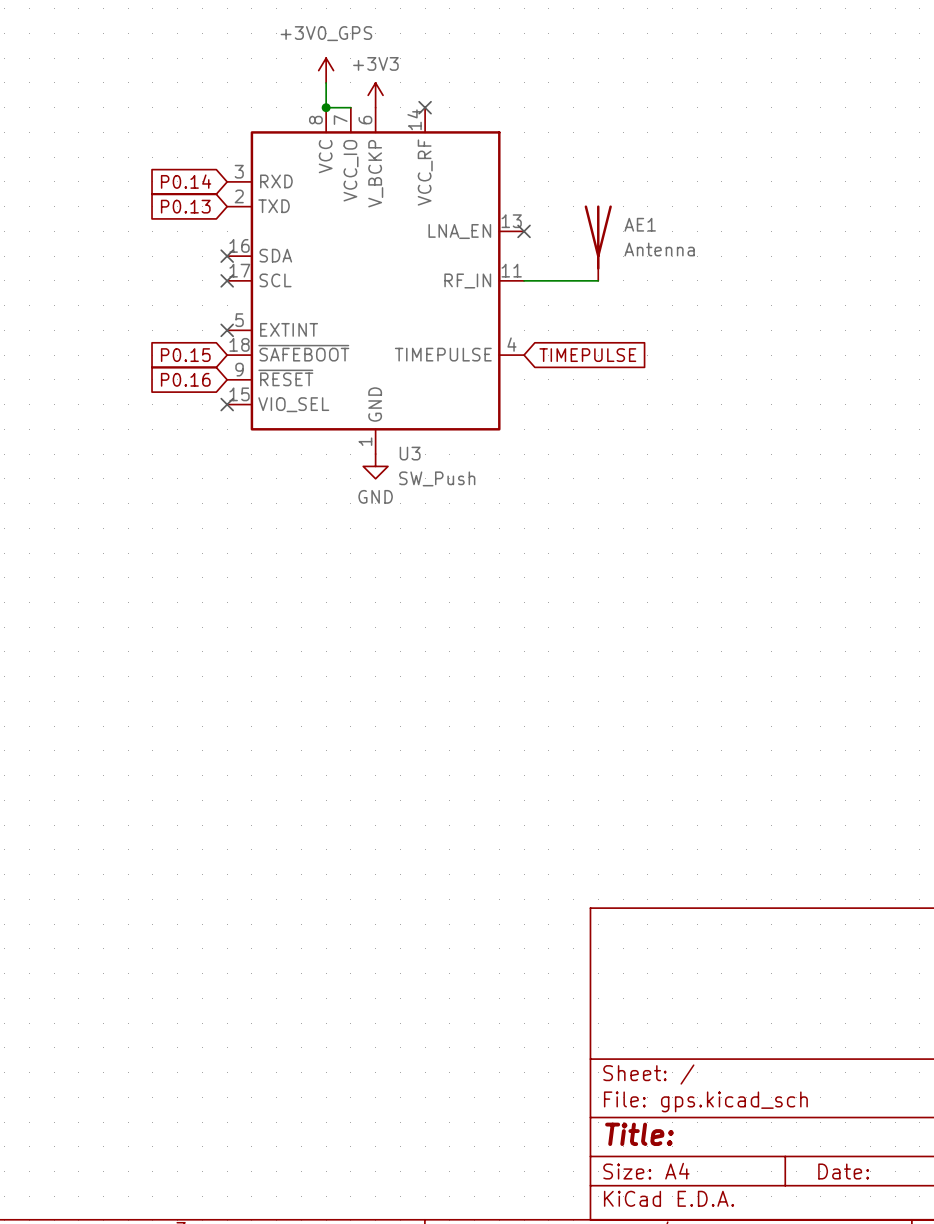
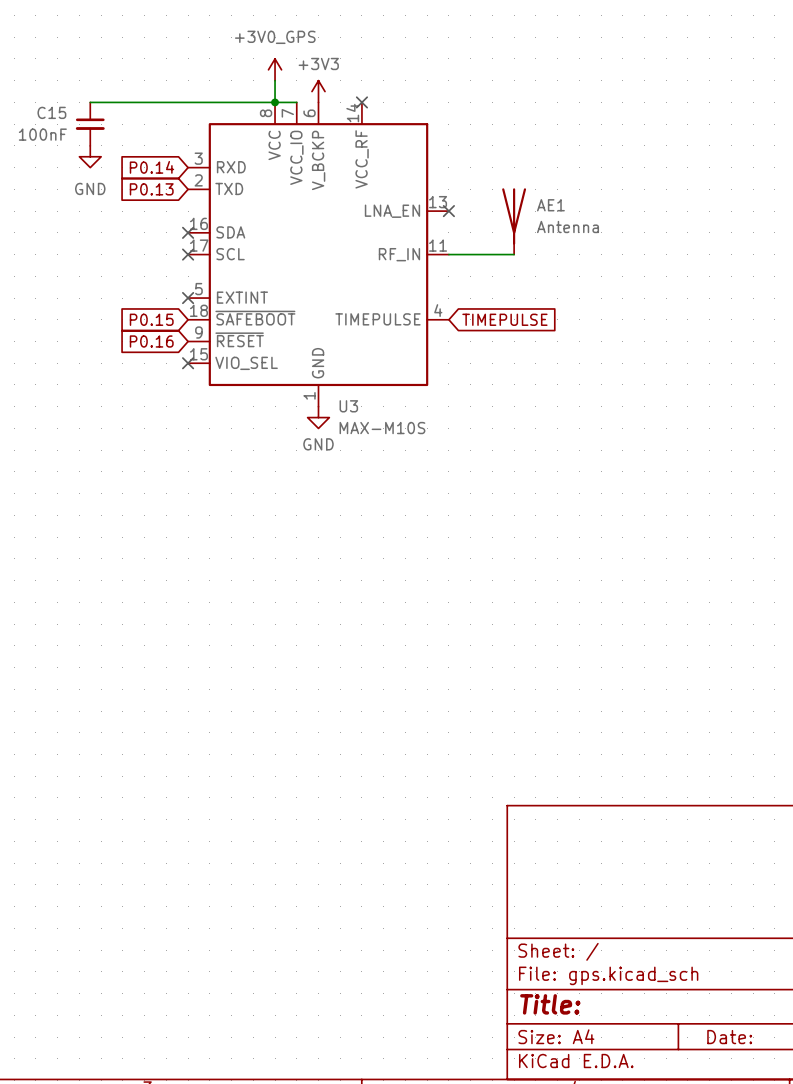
wire: none -> (90, 102) (275, 102)
C15: none -> 100nF (90, 124)
power symbol: none -> GND (90, 156)
U3 value: SW_Push (437, 478) -> MAX-M10S (382, 428)

